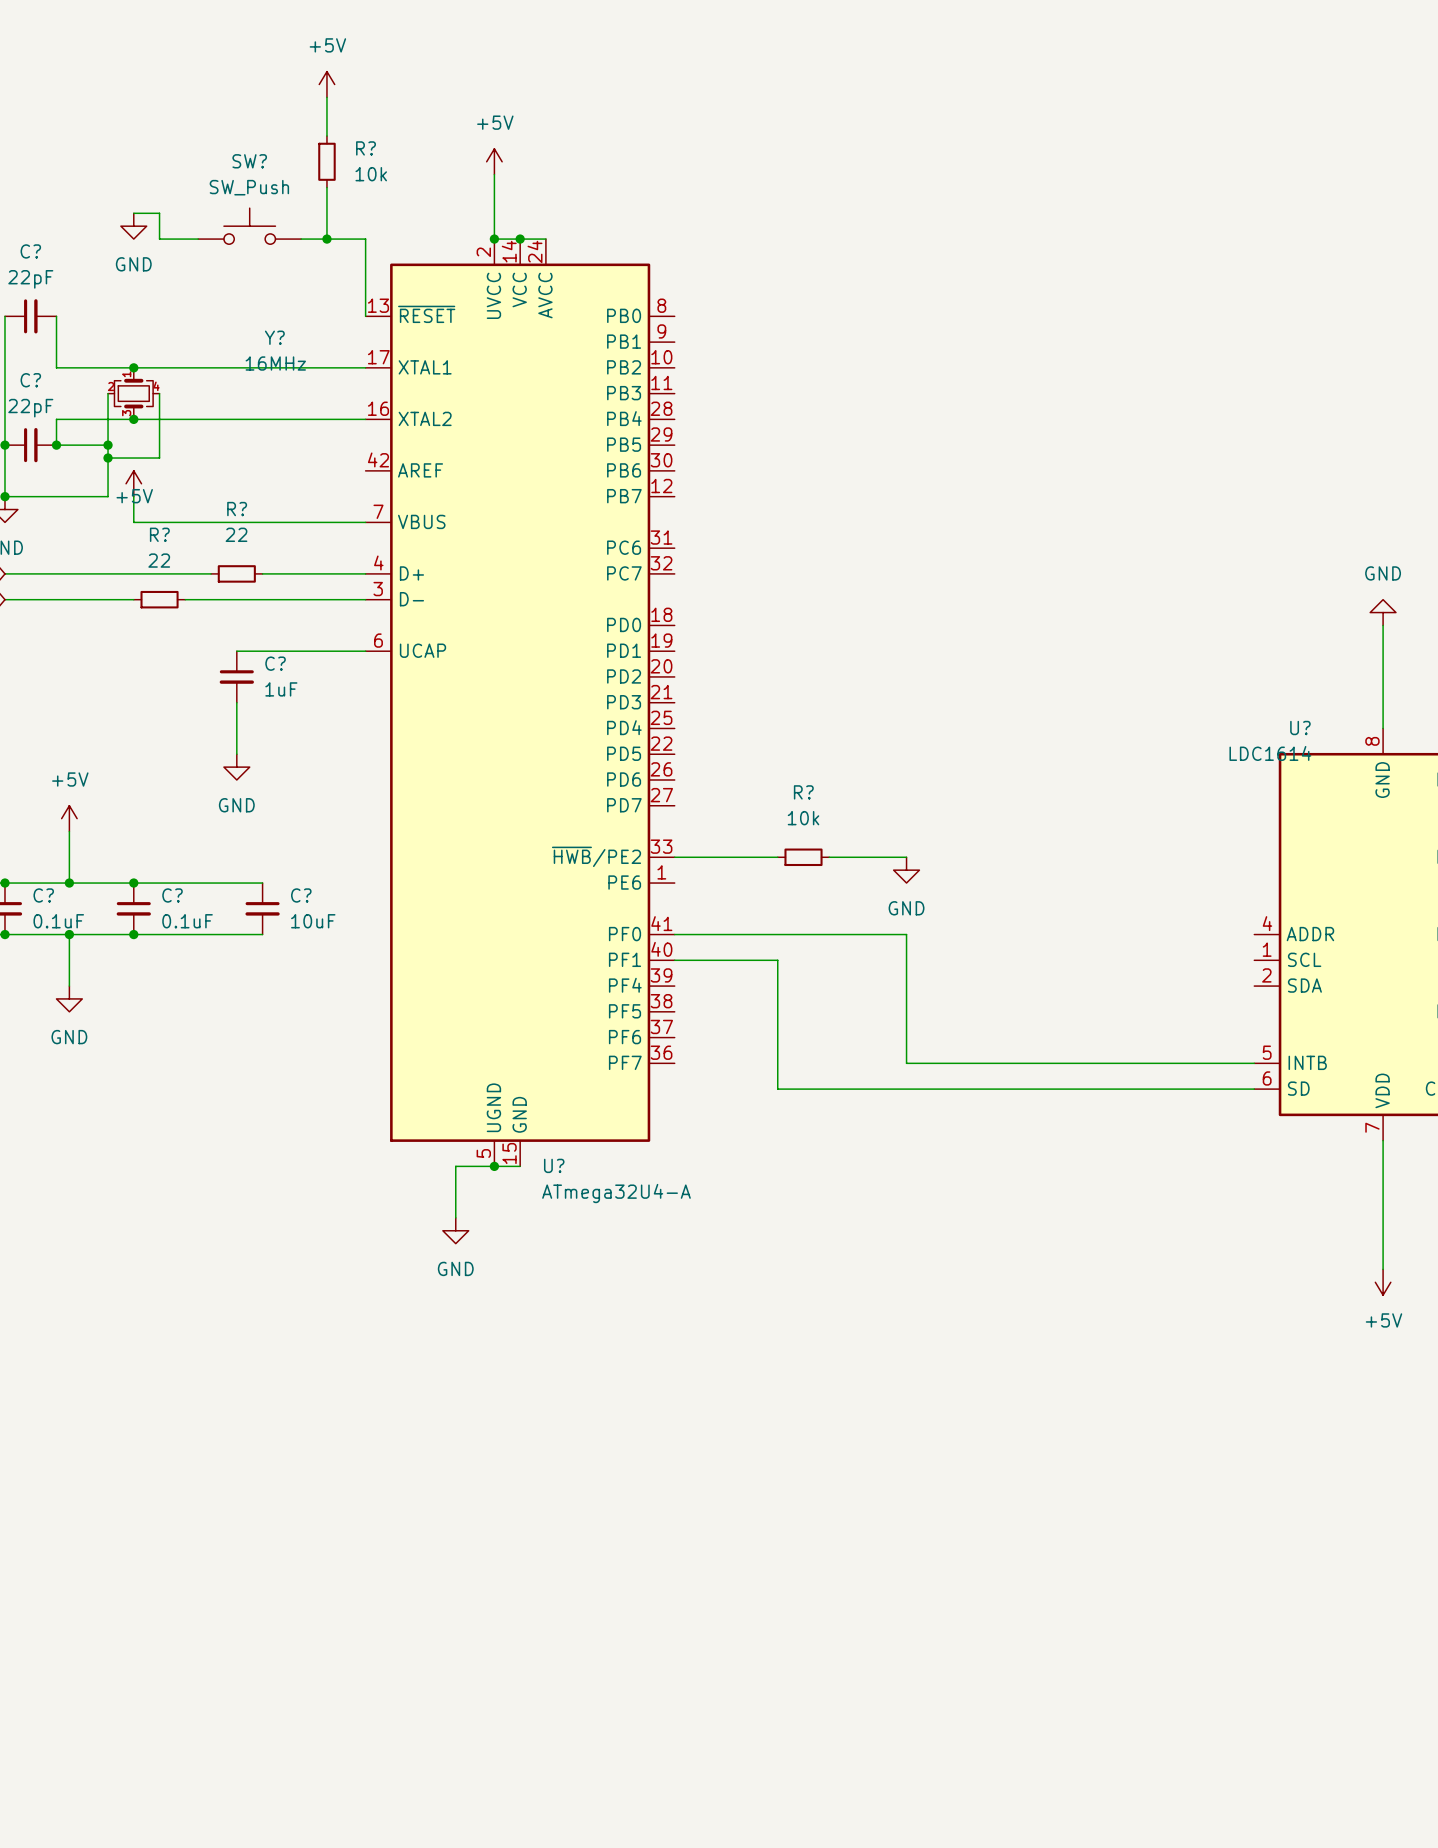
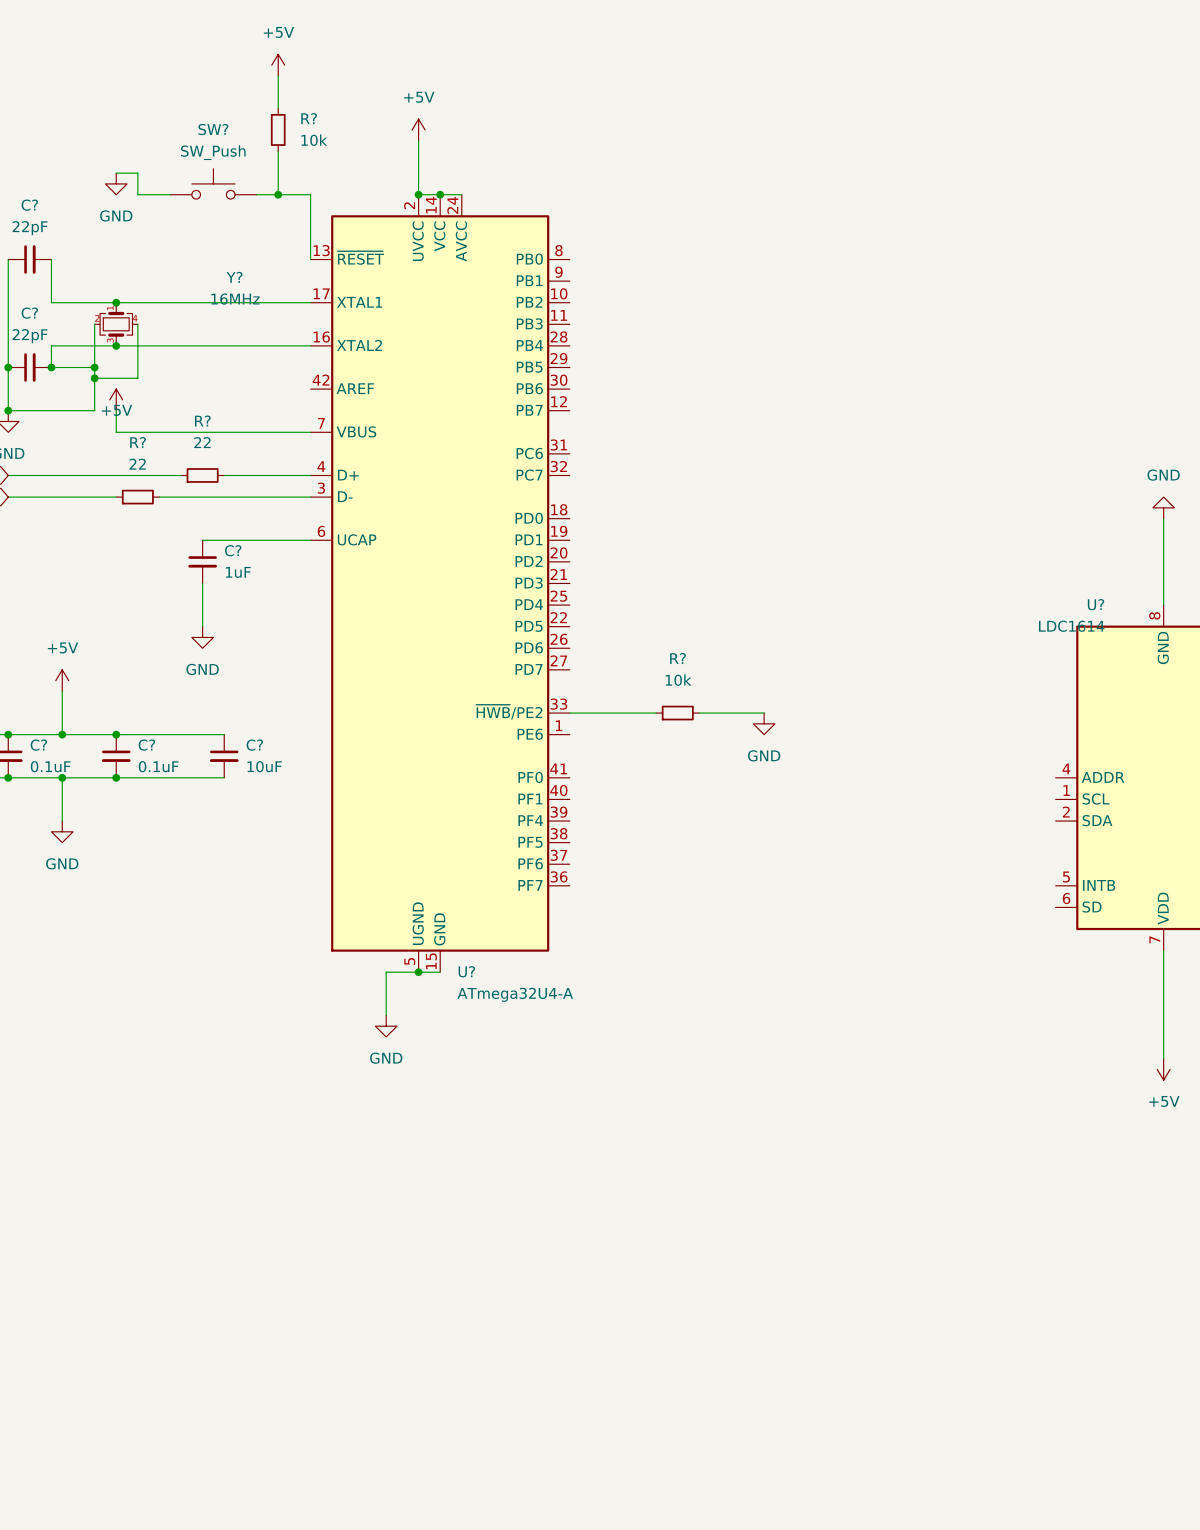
wire: (674, 934) (906, 934) (906, 1063) (1254, 1063) -> none
wire: (674, 960) (777, 960) (777, 1089) (1254, 1089) -> none

